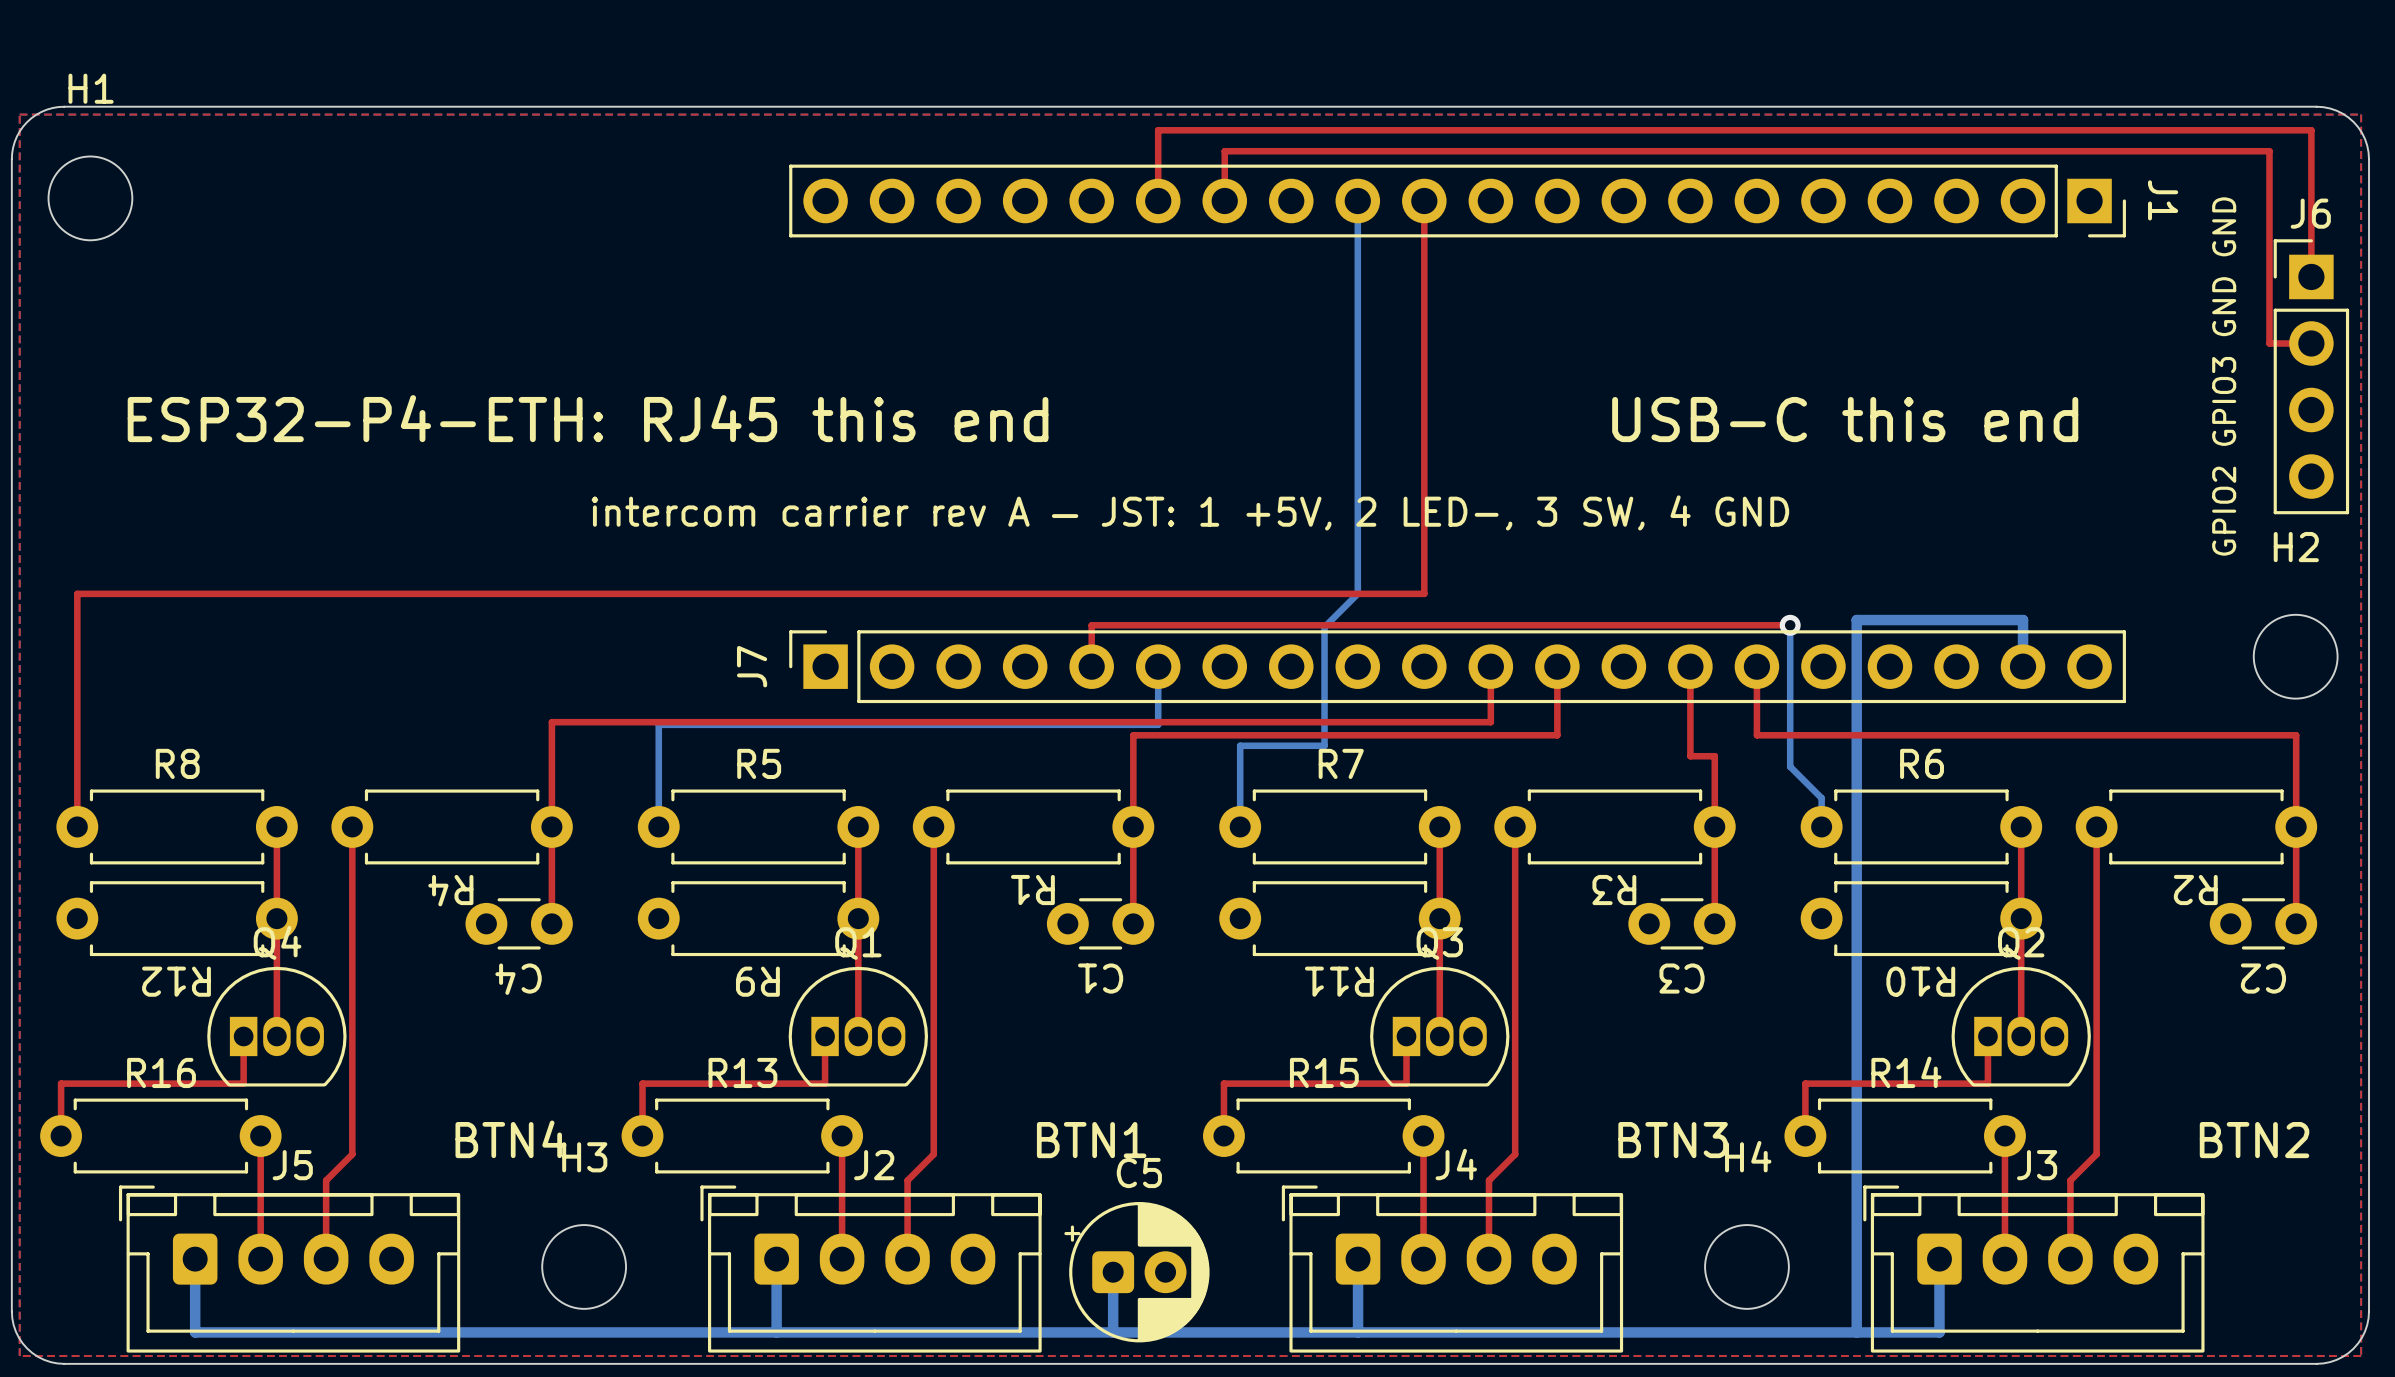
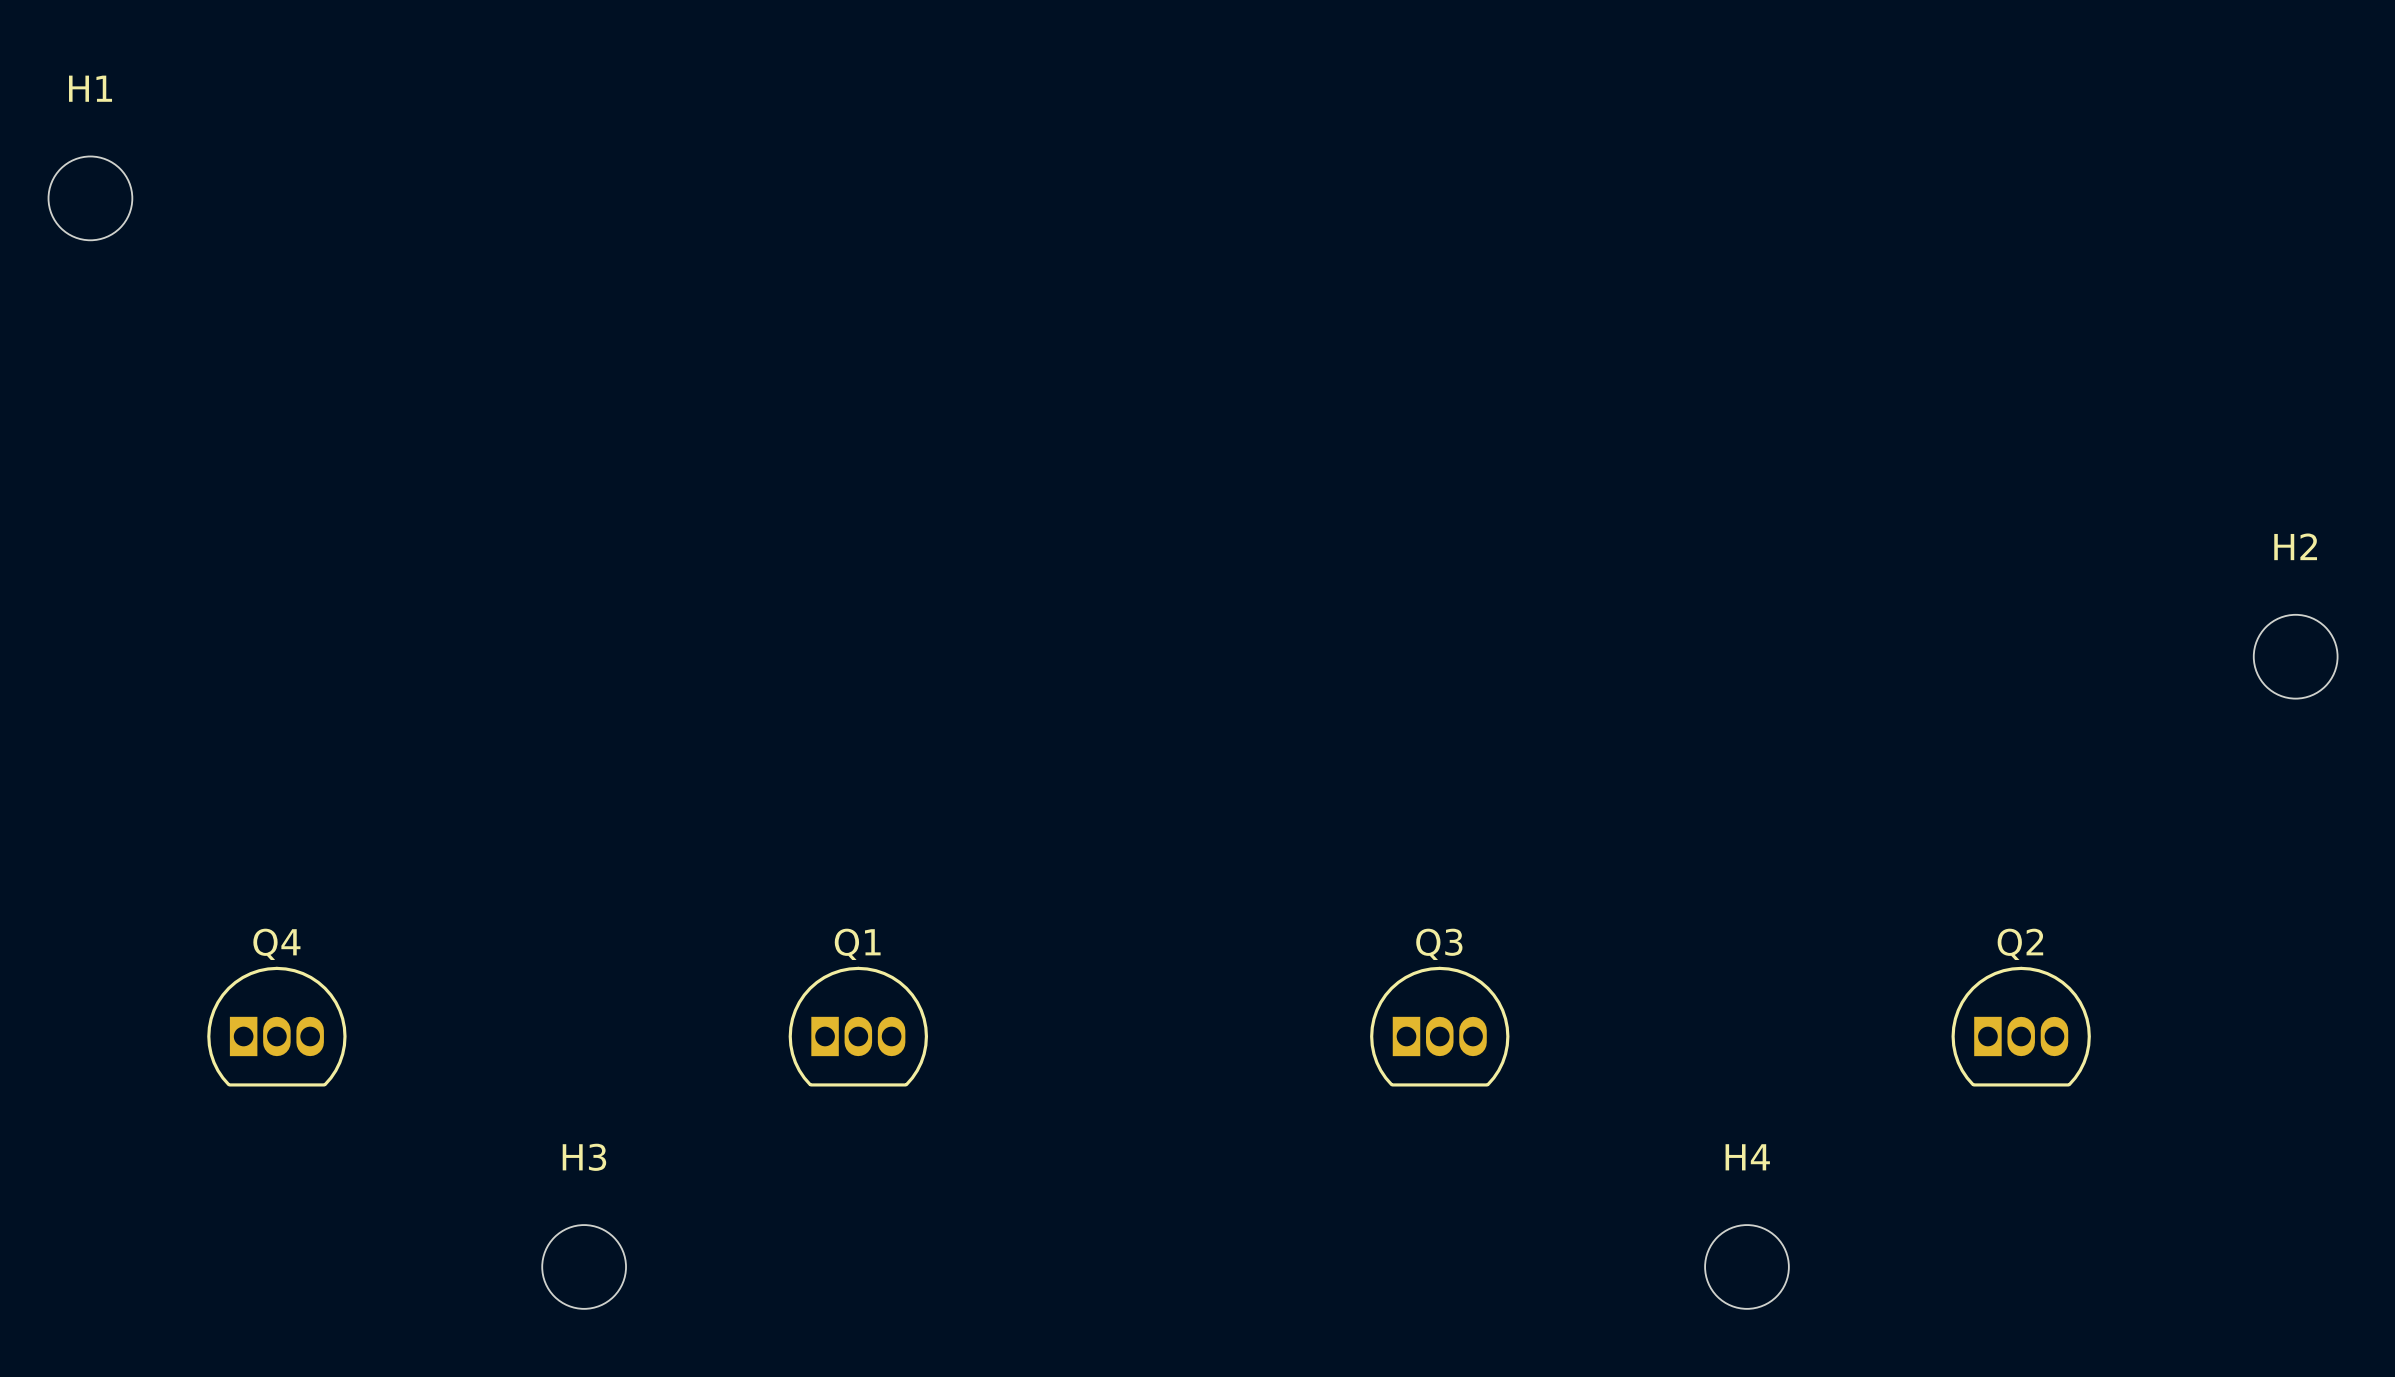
board edge: (64, 106) (2316, 106) (2330, 108) (2342, 113) (2353, 122) (2361, 132) (2367, 145) (2369, 159) (2369, 1311) (2367, 1325) (2361, 1337) (2353, 1348) (2342, 1356) (2330, 1362) (2316, 1363) (64, 1363) (50, 1362) (38, 1356) (27, 1348) (18, 1337) (13, 1325) (11, 1311) (11, 159) (17, 136) (27, 122) (41, 111) (64, 106) -> none
top zone outline: (19, 114) (2361, 114) (2361, 1356) (19, 1356) (19, 114) -> none
top track: (1158, 201) (1158, 130) (2311, 130) (2311, 276) -> none
top track: (1224, 201) (1224, 151) (2269, 151) (2269, 343) (2311, 343) -> none
bottom track: (1357, 201) (1357, 593) (1324, 627) (1324, 745) (1240, 745) (1240, 826) -> none
top track: (1424, 201) (1424, 593) (77, 593) (77, 826) -> none
J1: (1457, 201) -> none
text: GPIO2 GPIO3 GND GND (2224, 376) -> none
J6: (2311, 376) -> none
text: ESP32-P4-ETH: RJ45 this end (588, 418) -> none
text: USB-C this end (1845, 419) -> none
text: intercom carrier rev A — JST: 1 +5V, 2 LED-, 3 SW, 4 GND (1190, 512) -> none
top track: (1790, 625) (1091, 625) (1091, 666) -> none
bottom track: (1790, 625) (1790, 766) (1821, 798) (1821, 826) -> none
via: (1790, 625) -> none
bottom track: (1158, 666) (1158, 724) (658, 724) (658, 826) -> none
J7: (1457, 666) -> none
top track: (1490, 666) (1490, 722) (551, 722) (551, 923) -> none
top track: (1557, 666) (1557, 735) (1133, 735) (1133, 923) -> none
top track: (1690, 666) (1690, 756) (1714, 756) (1714, 923) -> none
top track: (1756, 666) (1756, 735) (2296, 735) (2296, 923) -> none
bottom track: (2023, 666) (2023, 620) (1856, 620) (1856, 1332) -> none
R8: (177, 826) -> none
top track: (276, 826) (276, 1036) -> none
top track: (352, 826) (352, 1154) (326, 1180) (326, 1259) -> none
R4: (452, 826) -> none
R5: (758, 826) -> none
top track: (858, 826) (858, 1036) -> none
top track: (933, 826) (933, 1154) (907, 1180) (907, 1259) -> none
R1: (1033, 826) -> none
R7: (1339, 826) -> none
top track: (1439, 826) (1439, 1036) -> none
top track: (1515, 826) (1515, 1154) (1489, 1180) (1489, 1259) -> none
R3: (1614, 826) -> none
R6: (1921, 826) -> none
top track: (2021, 826) (2021, 1036) -> none
top track: (2096, 826) (2096, 1154) (2070, 1180) (2070, 1259) -> none
R2: (2196, 826) -> none
R12: (177, 918) -> none
R9: (758, 918) -> none
R11: (1339, 918) -> none
R10: (1921, 918) -> none
C4: (519, 923) -> none
C1: (1100, 923) -> none
C3: (1682, 923) -> none
C2: (2263, 923) -> none
top track: (243, 1036) (243, 1083) (61, 1083) (61, 1136) -> none
top track: (825, 1036) (825, 1083) (642, 1083) (642, 1136) -> none
top track: (1406, 1036) (1406, 1083) (1223, 1083) (1223, 1136) -> none
top track: (1987, 1036) (1987, 1083) (1805, 1083) (1805, 1136) -> none
R16: (160, 1136) -> none
top track: (260, 1136) (260, 1259) -> none
R13: (742, 1136) -> none
top track: (842, 1136) (842, 1259) -> none
R15: (1323, 1136) -> none
top track: (1423, 1136) (1423, 1259) -> none
R14: (1905, 1136) -> none
top track: (2004, 1136) (2004, 1259) -> none
text: BTN4 (510, 1139) -> none
text: BTN1 (1091, 1140) -> none
text: BTN3 (1673, 1140) -> none
text: BTN2 (2254, 1140) -> none
bottom track: (195, 1259) (195, 1332) (1939, 1332) (1939, 1259) -> none
bottom track: (776, 1259) (776, 1332) -> none
bottom track: (1358, 1259) (1358, 1332) -> none
J5: (289, 1269) -> none
J2: (871, 1269) -> none
J4: (1452, 1269) -> none
J3: (2033, 1269) -> none
bottom track: (1113, 1272) (1113, 1332) -> none
C5: (1136, 1272) -> none

